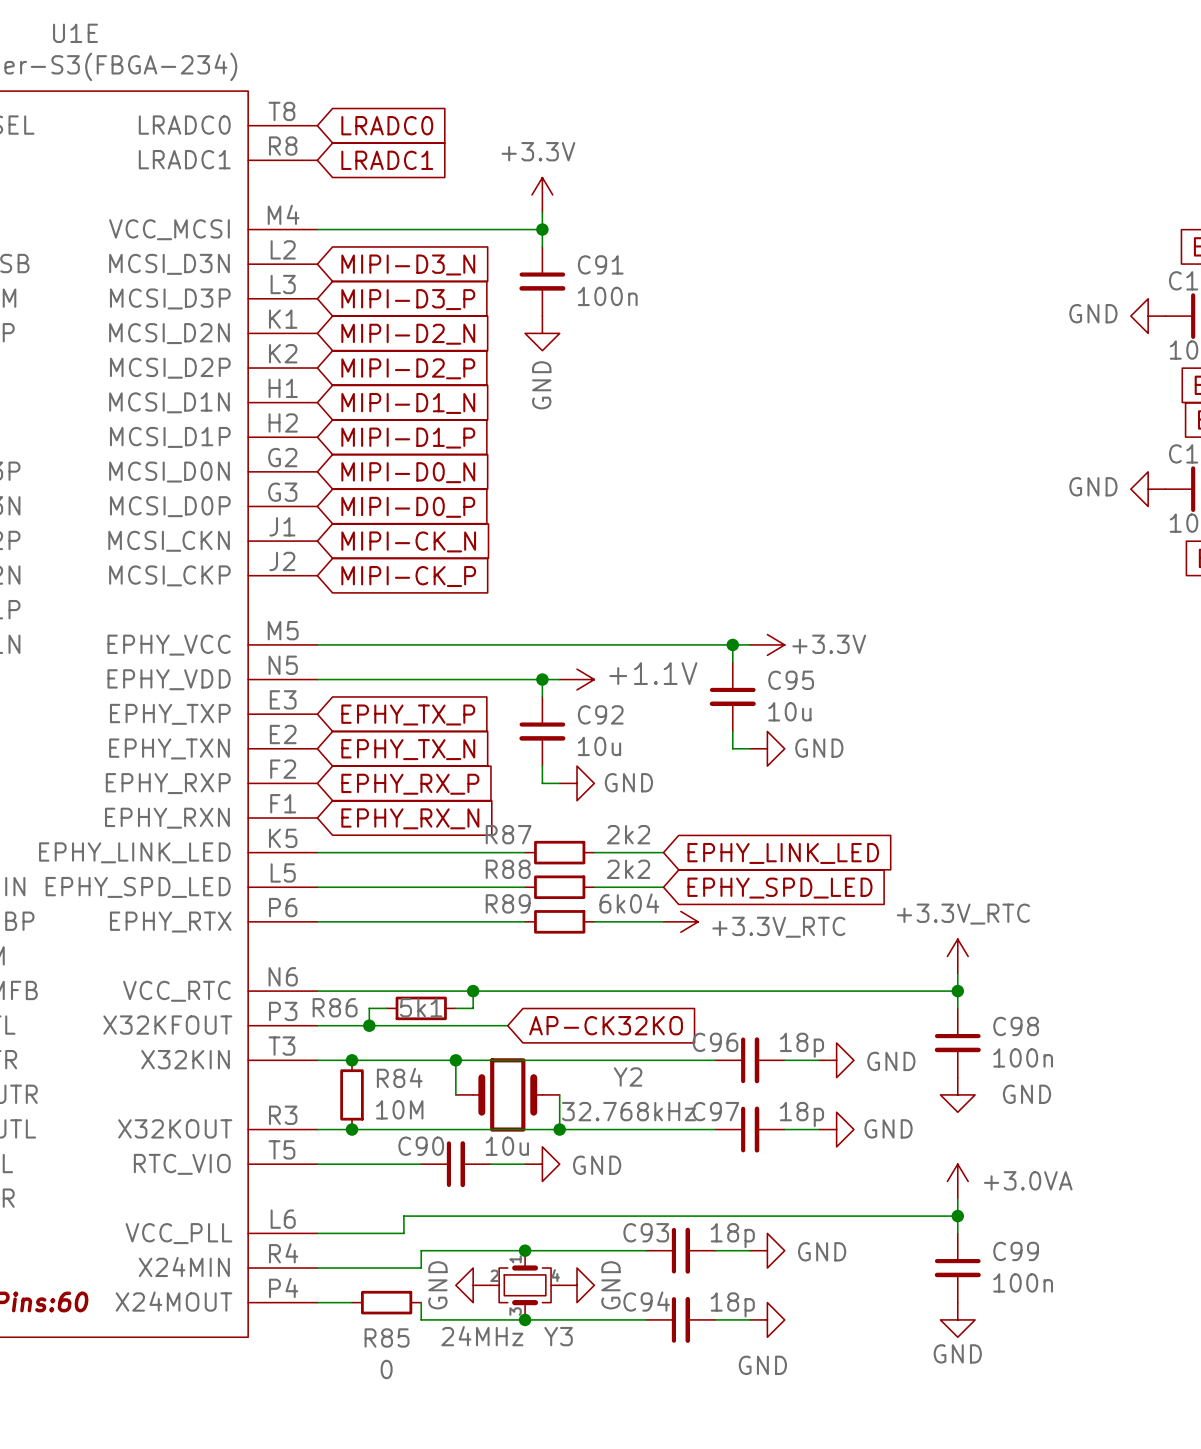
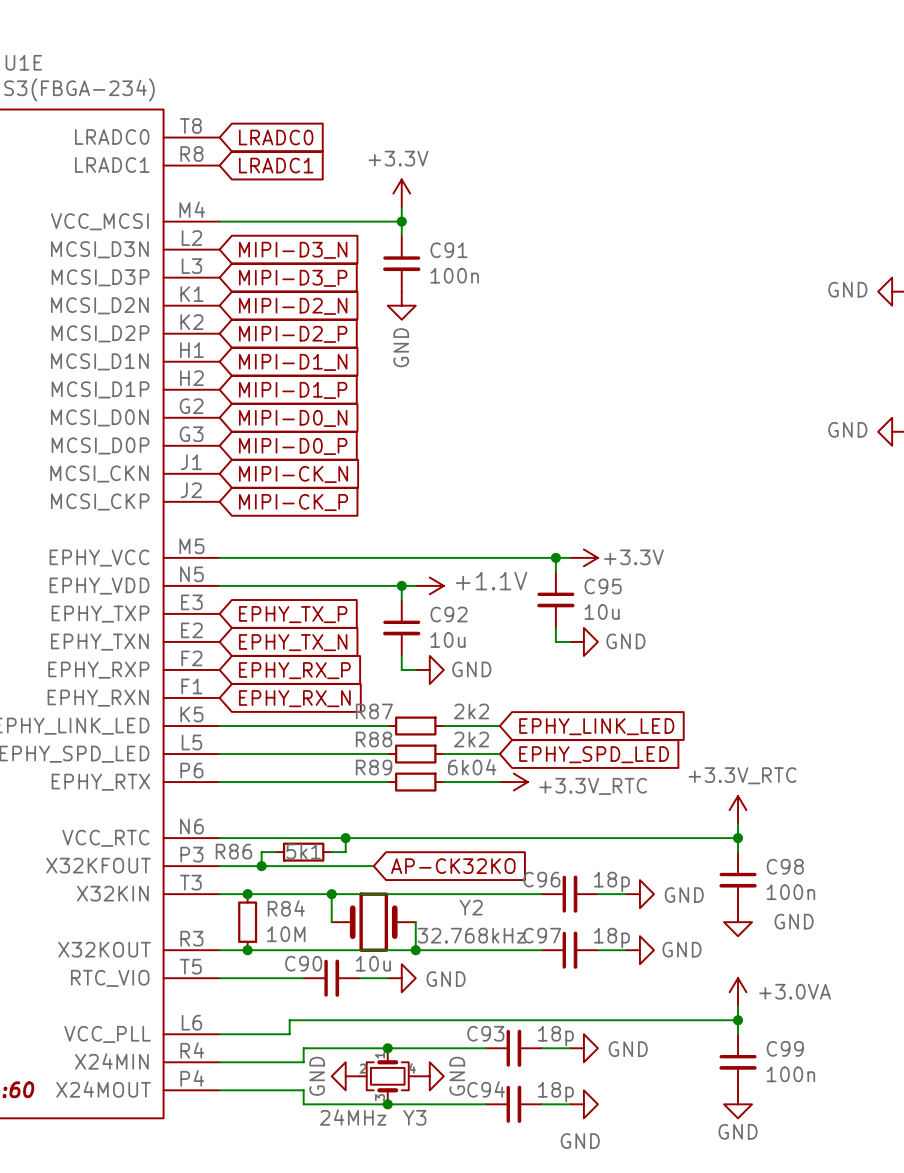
wire: none -> (247, 1090) (303, 1090)
R85: 0 (386, 1302) -> none

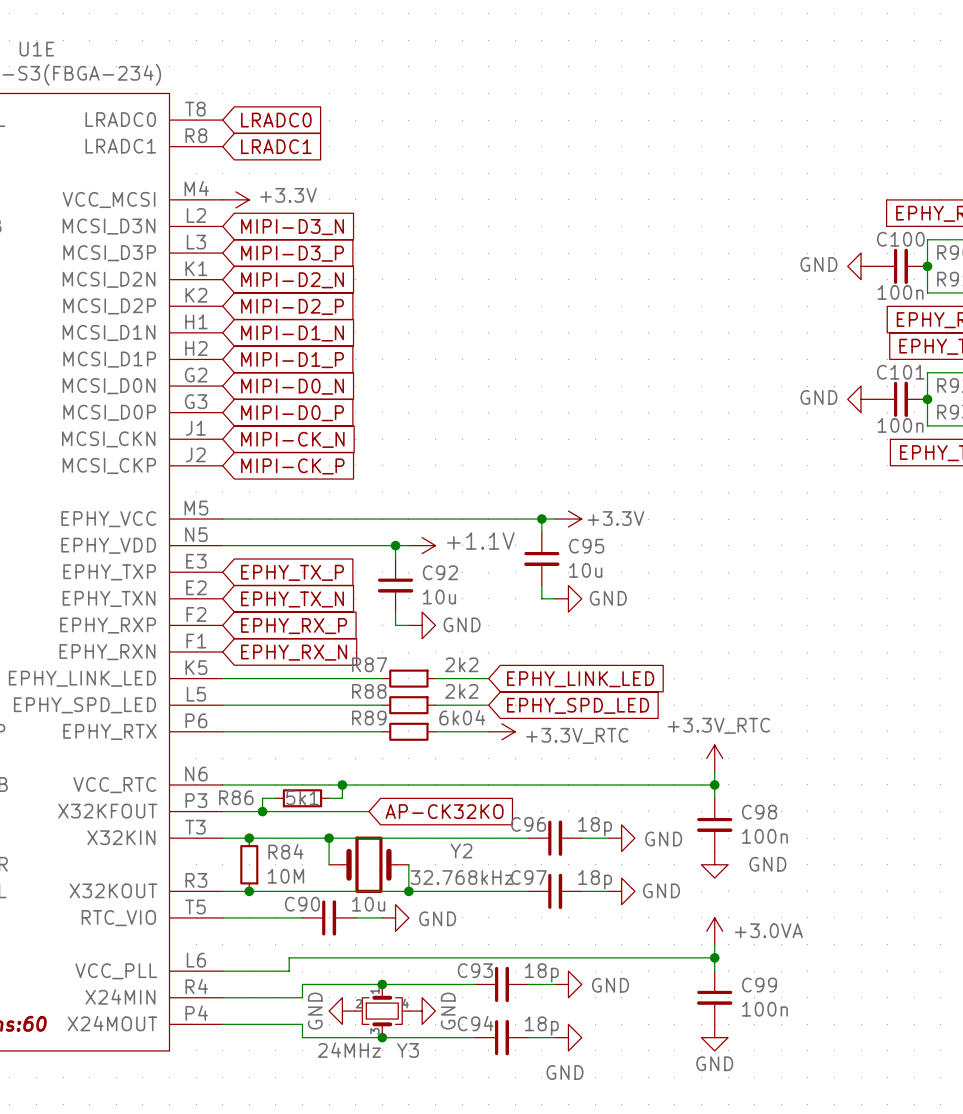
power symbol text position: +3.3V (398, 158) -> +3.3V (288, 195)
power symbol rotation: 0° (401, 193) -> 90° clockwise (235, 199)
power symbol position: +3.3V (401, 193) -> +3.3V (235, 199)
wire: (401, 207) (401, 235) -> none
wire: (219, 221) (401, 221) -> none
junction: (401, 221) -> none
C91: 100n (401, 263) -> none
power symbol: GND (401, 305) -> none

